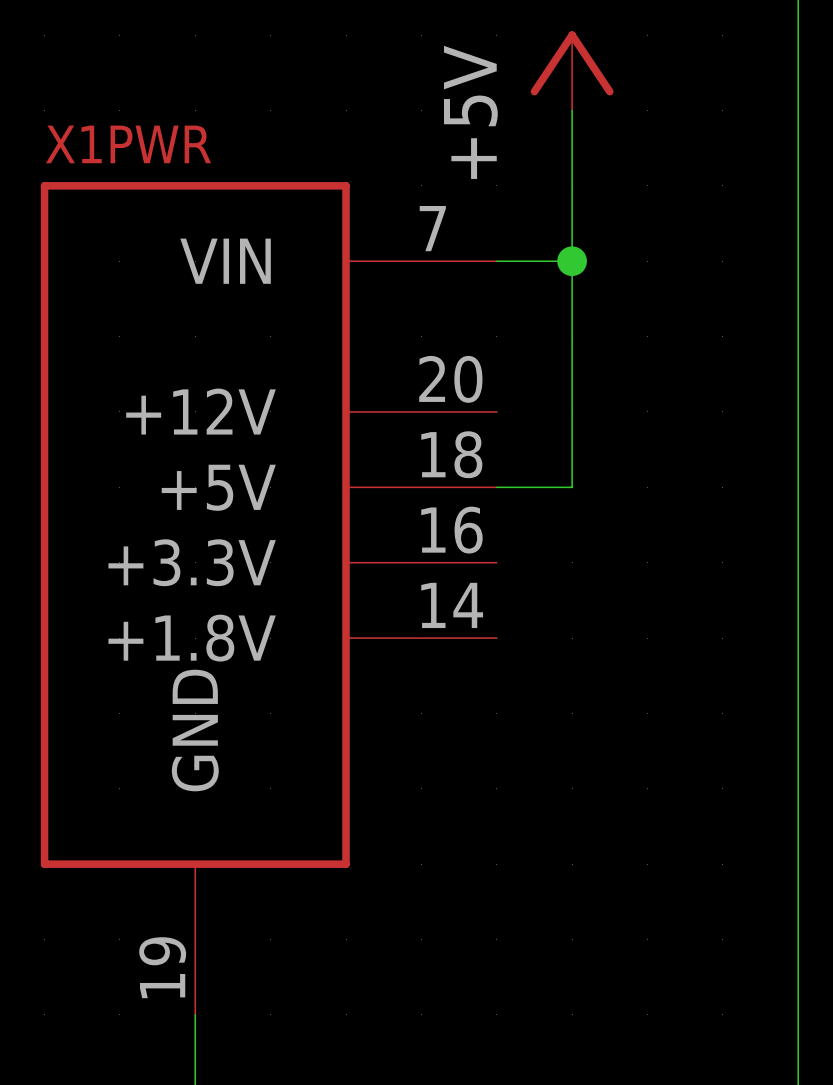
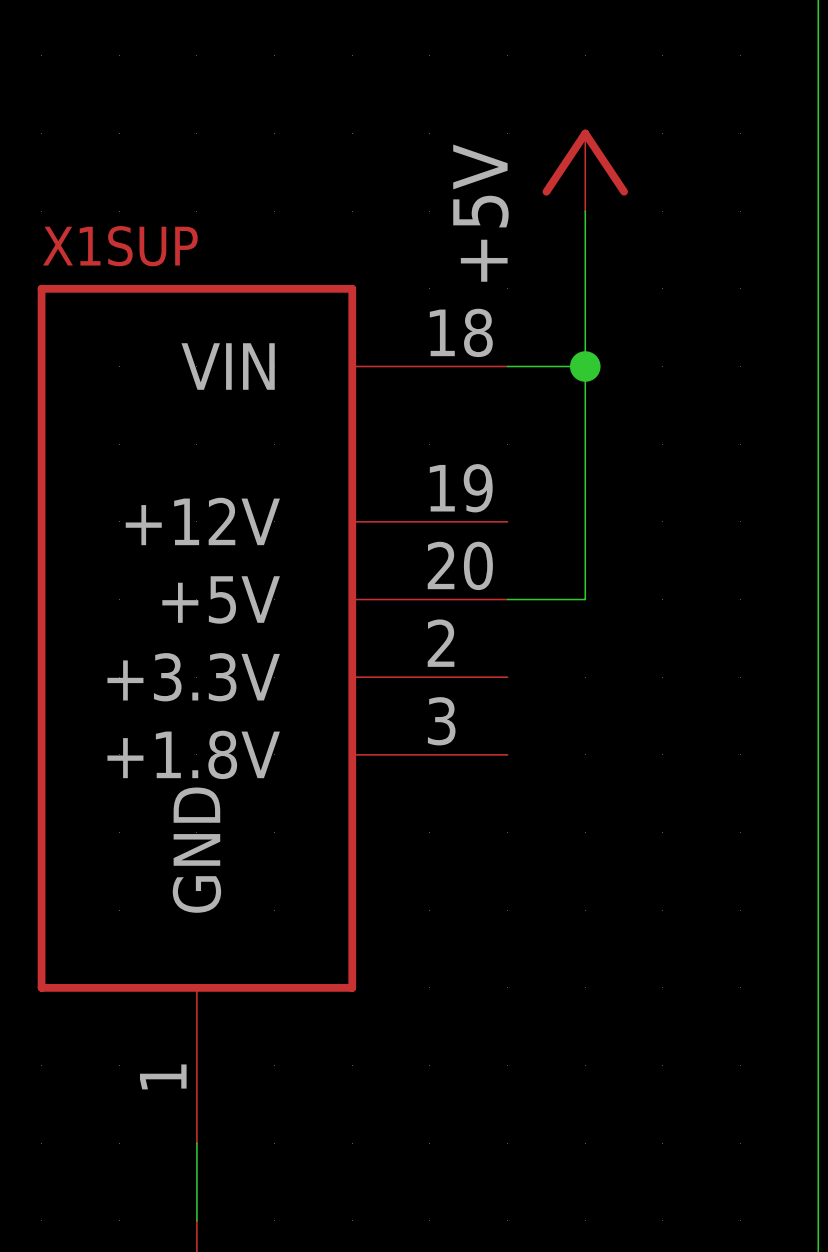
X1PWR name: X1PWR (128, 144) -> X1SUP (120, 246)
X1PWR pin number: 7 (432, 228) -> 18 (461, 332)
X1PWR pin number: 20 (450, 379) -> 19 (461, 488)
X1PWR pin number: 18 (451, 454) -> 20 (460, 565)
X1PWR pin number: 16 (451, 530) -> 2 (441, 643)
X1PWR pin number: 14 (452, 605) -> 3 (441, 721)
X1PWR pin number: 19 (162, 967) -> 1 (163, 1076)

